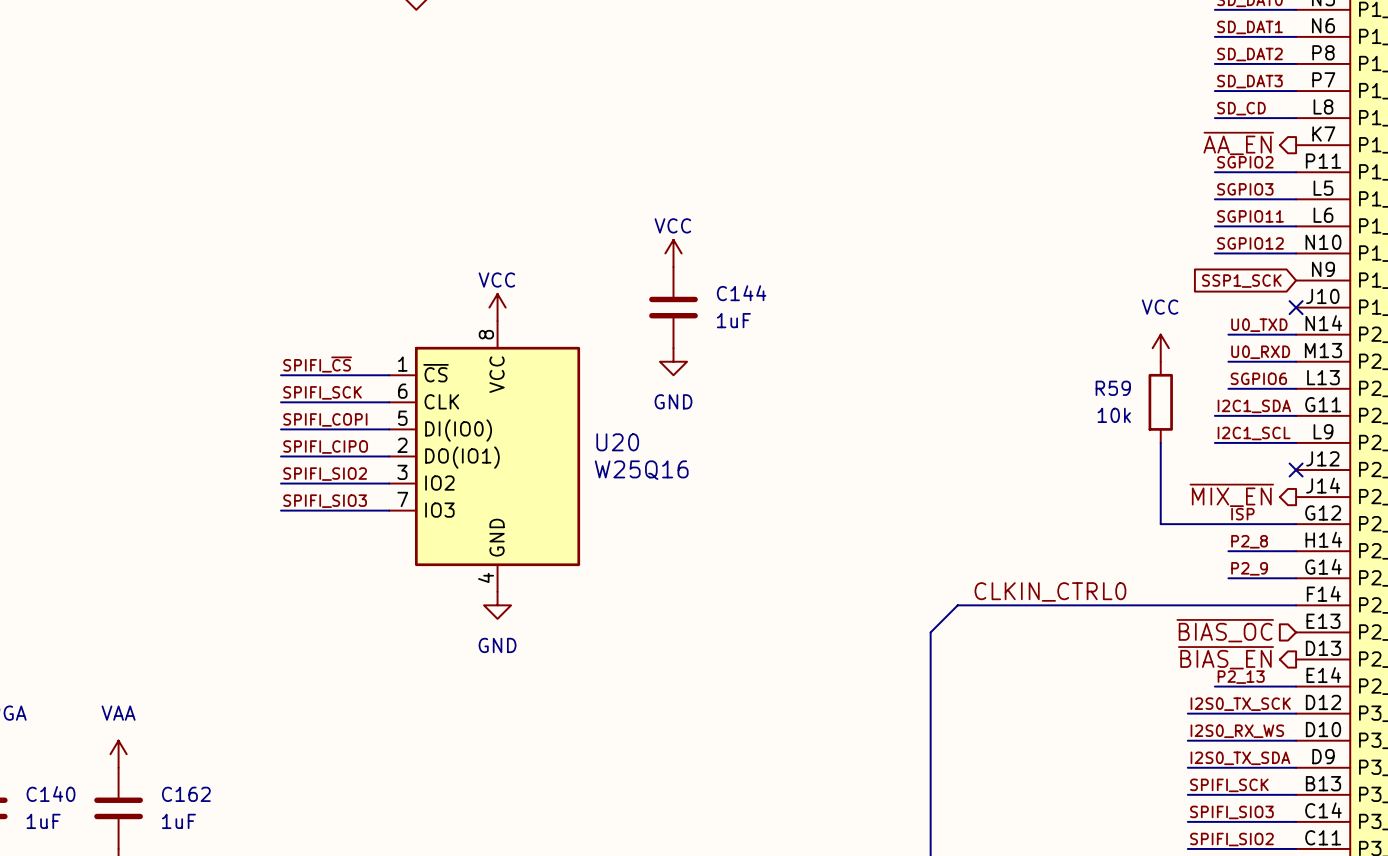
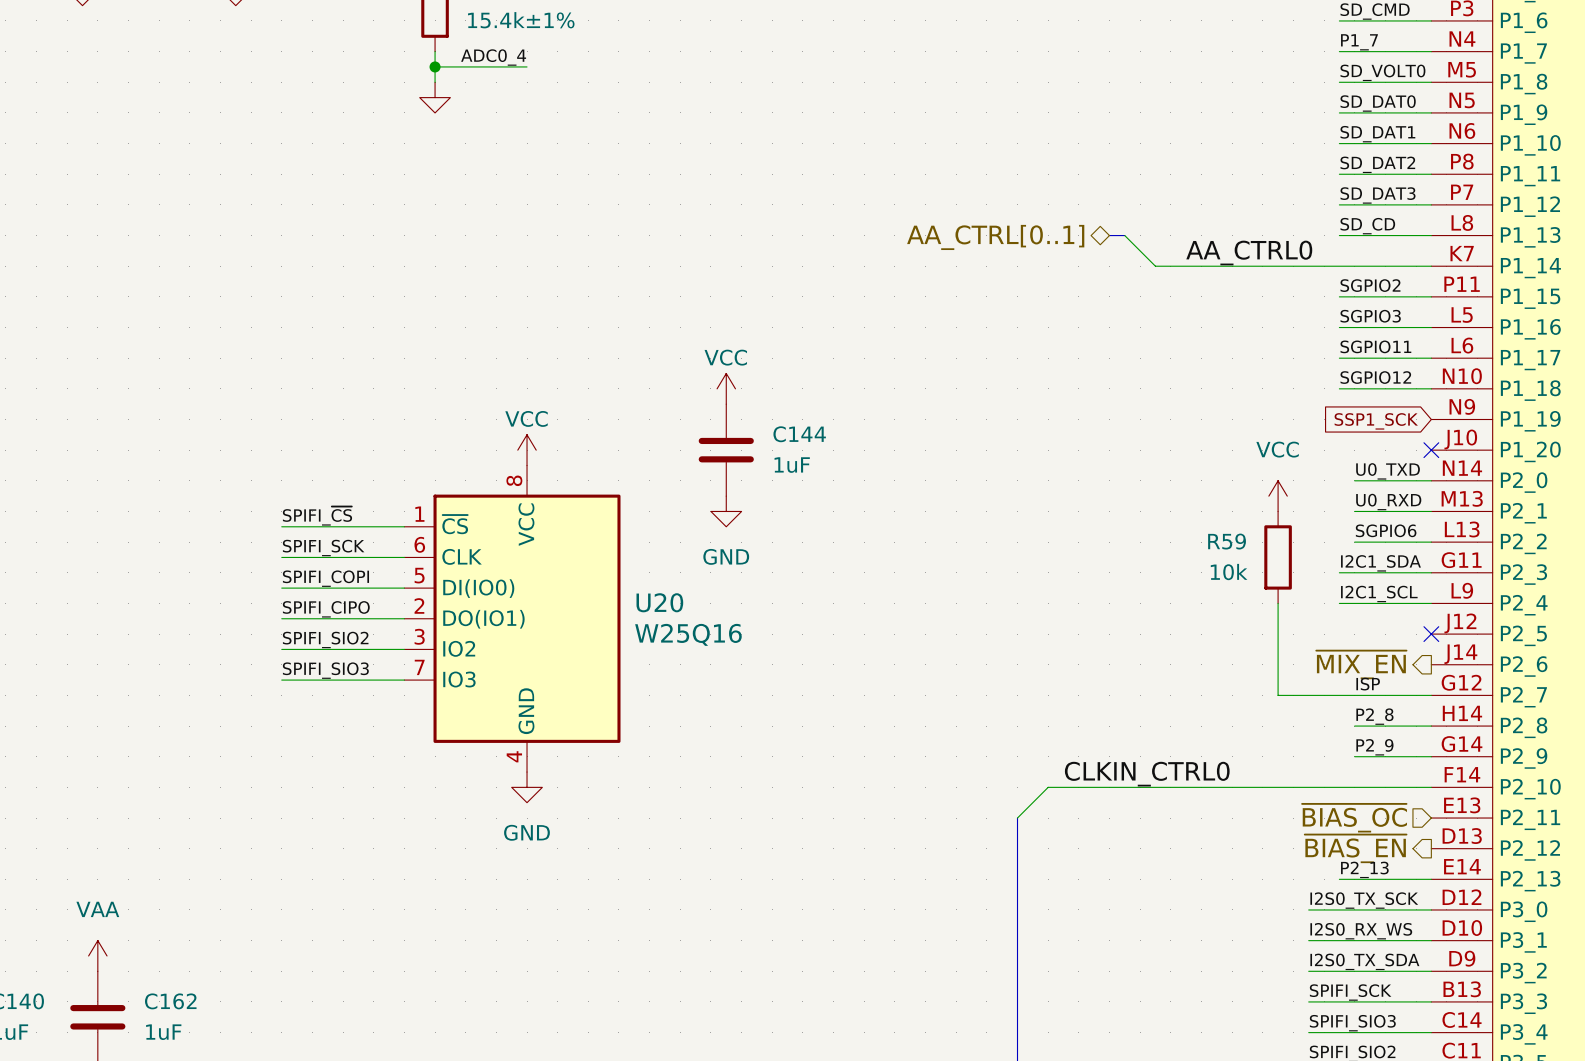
bus: none -> (1109, 235) (1124, 235)
wire: none -> (1124, 235) (1155, 266) (1431, 266)
hierarchical label: none -> AA_CTRL[0..1] (995, 237)
label: none -> AA_CTRL0 (1249, 252)
hierarchical label: ~{AA_EN} (1238, 143) -> none

